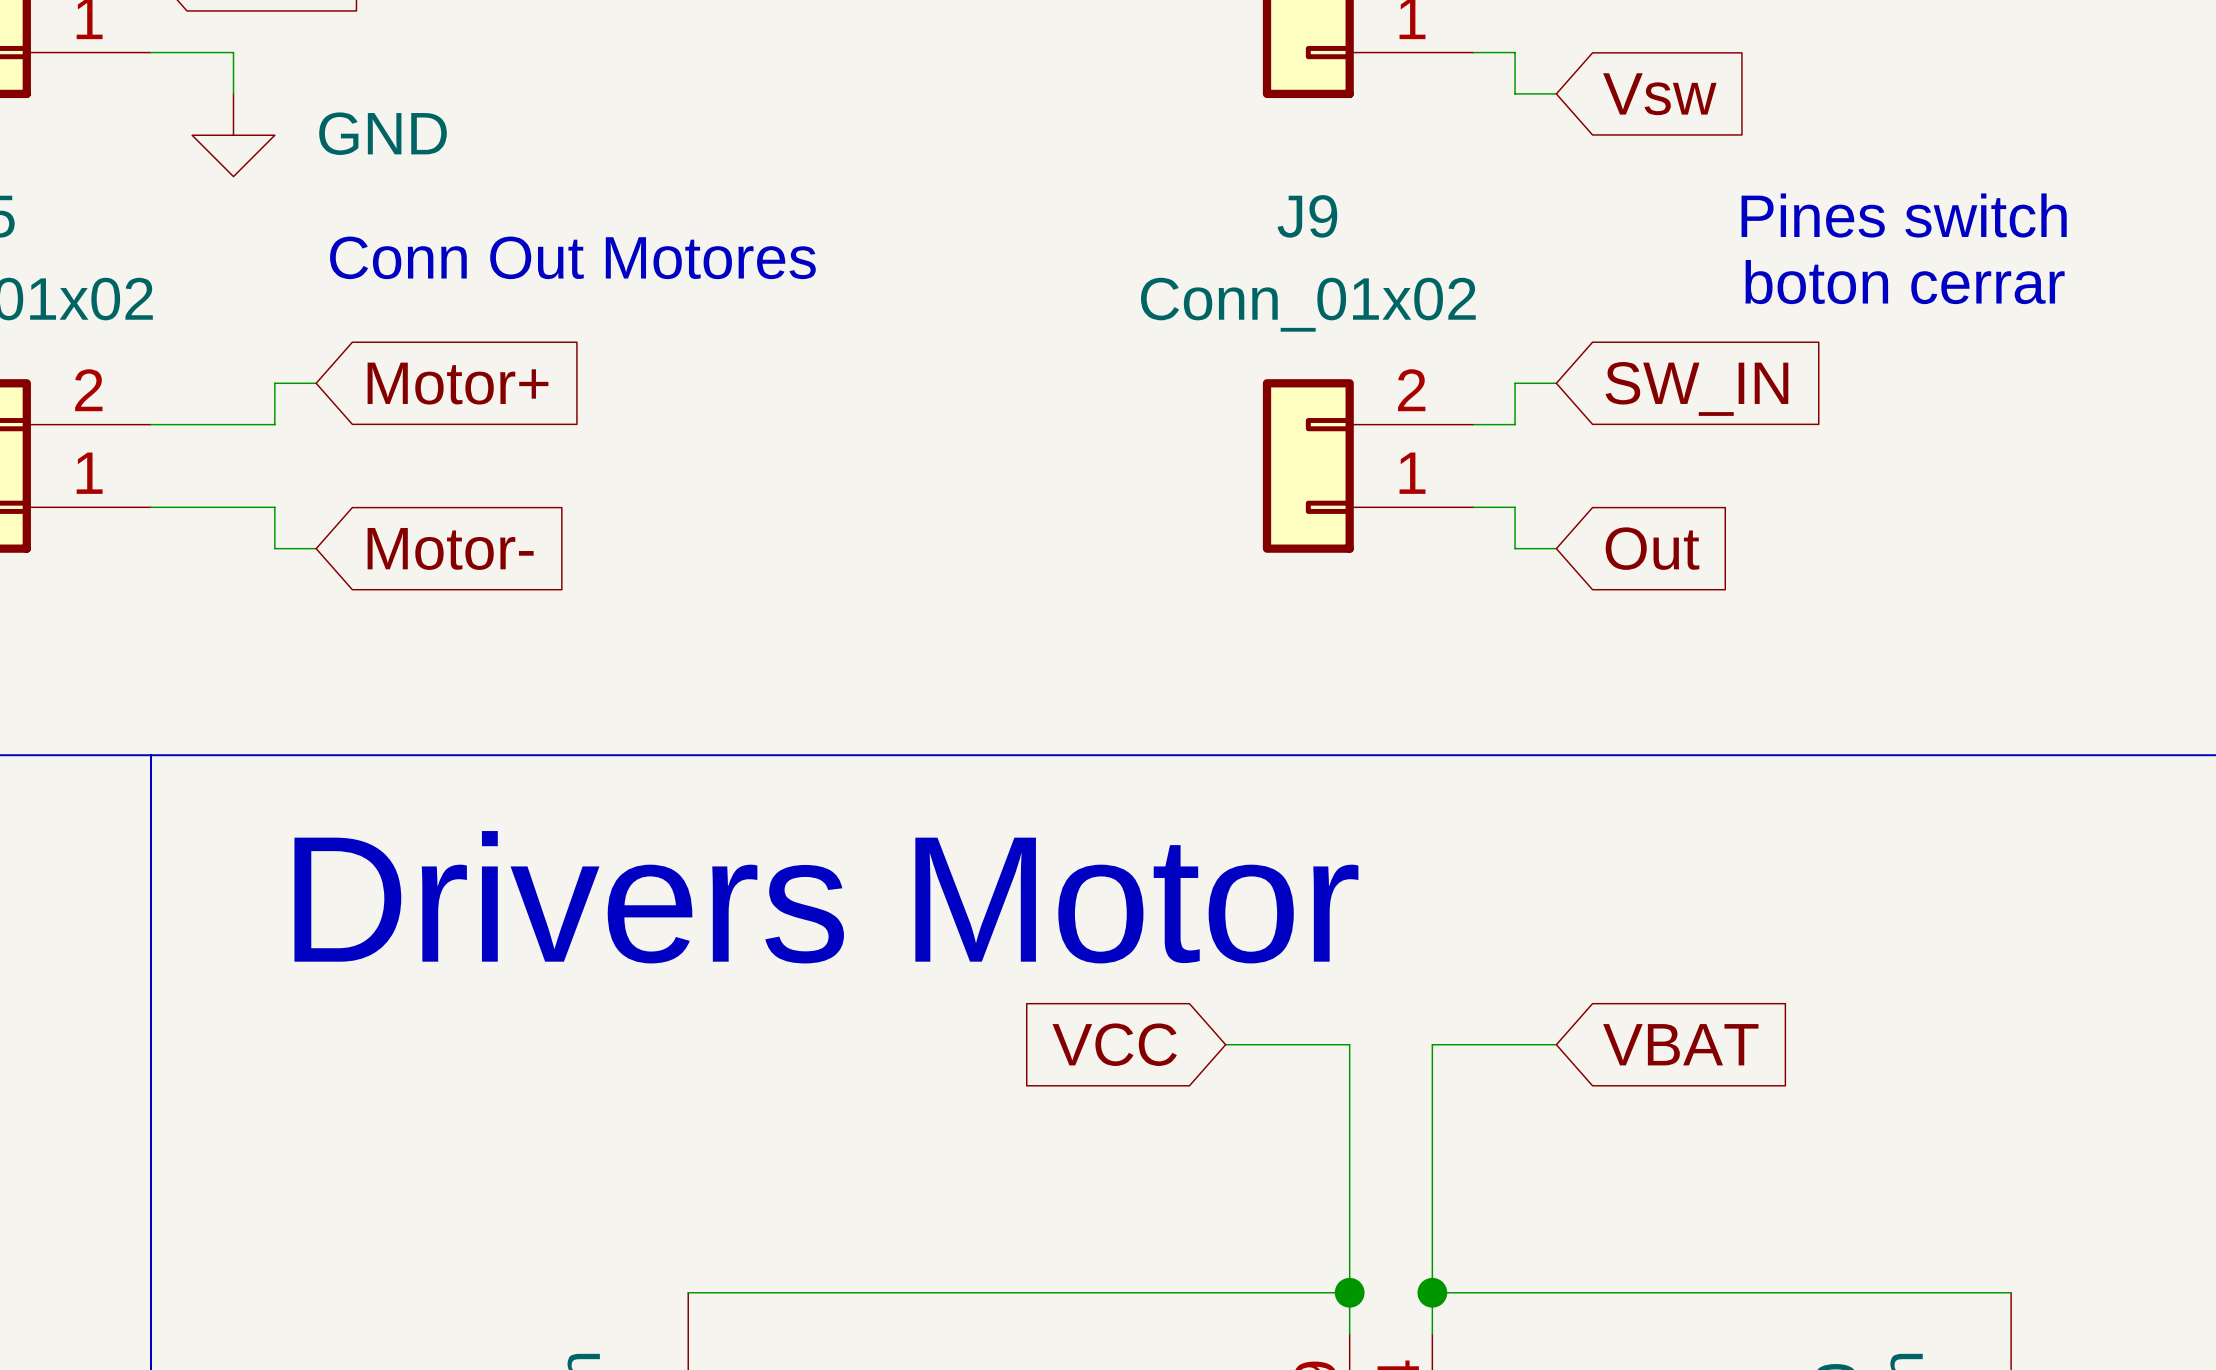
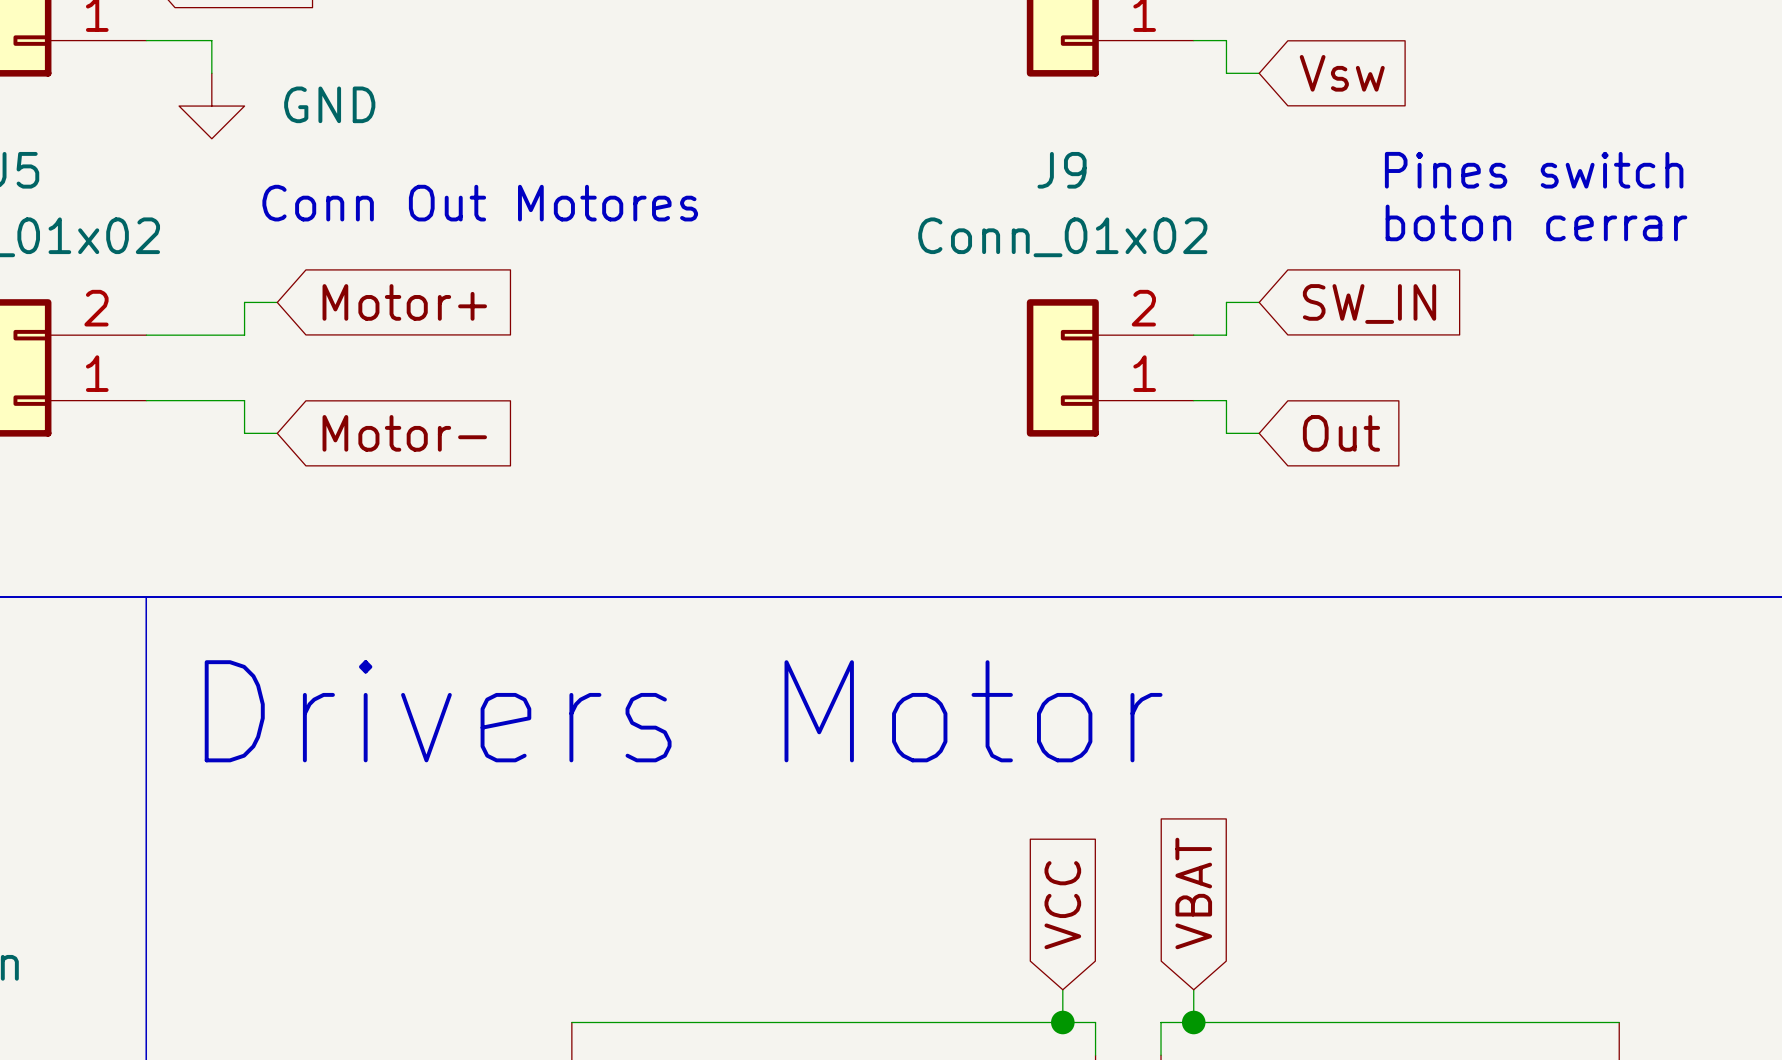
global label rotation: 0° (1114, 1044) -> 90° clockwise (1062, 905)
wire: (1225, 1044) (1349, 1044) (1349, 1292) -> none
wire: (1556, 1044) (1432, 1044) (1432, 1292) -> none
global label rotation: 0° (1680, 1044) -> 90° counterclockwise (1193, 893)
wire: none -> (1062, 989) (1062, 1022)
wire: none -> (1193, 989) (1193, 1022)
junction position: (1349, 1292) -> (1062, 1022)
junction position: (1432, 1292) -> (1193, 1022)

